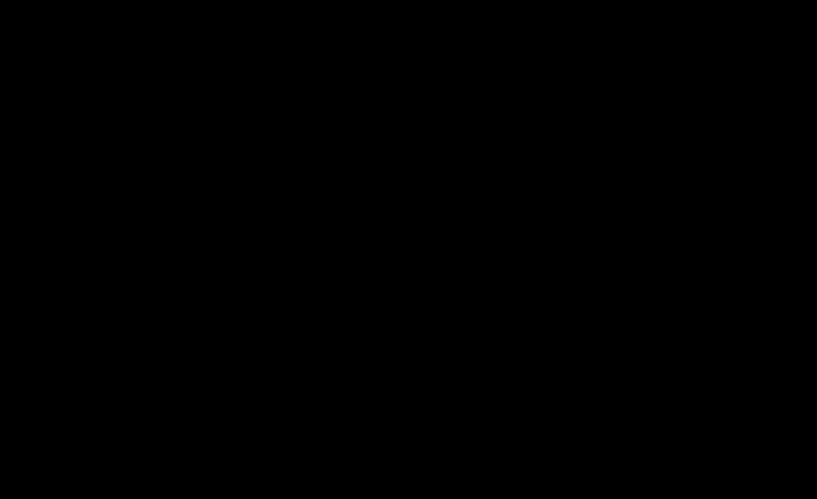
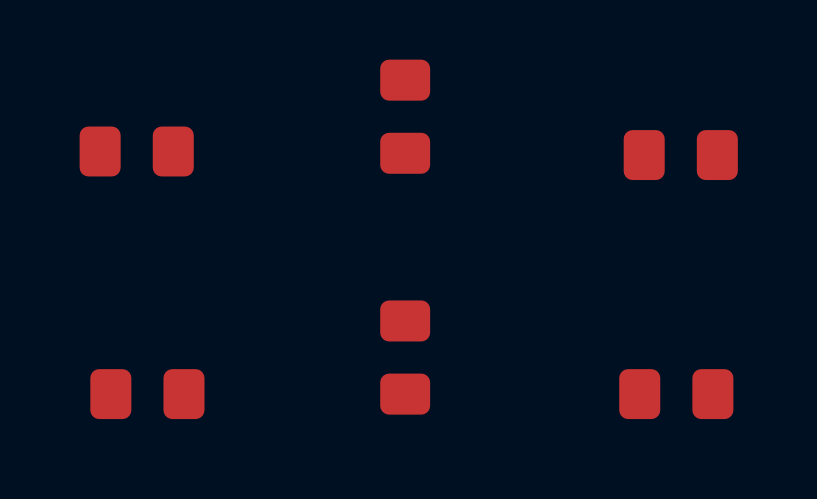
part: none -> (405, 116)
part: none -> (136, 151)
part: none -> (680, 155)
part: none -> (405, 357)
part: none -> (147, 394)
part: none -> (676, 394)

